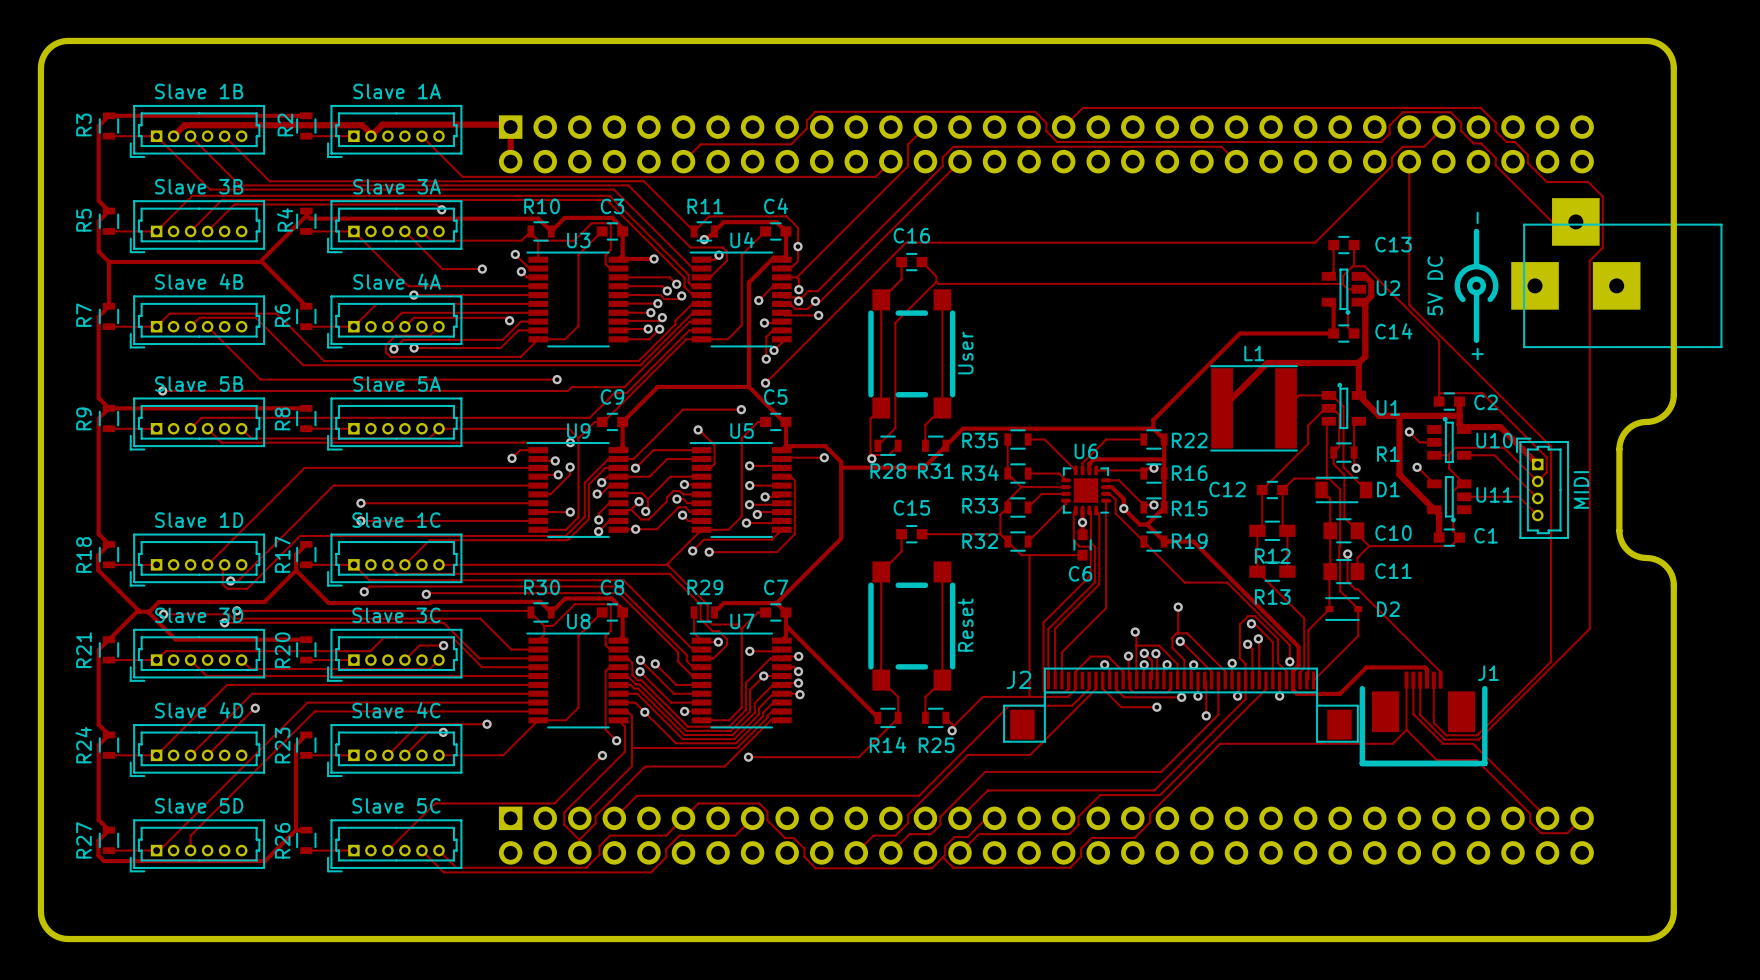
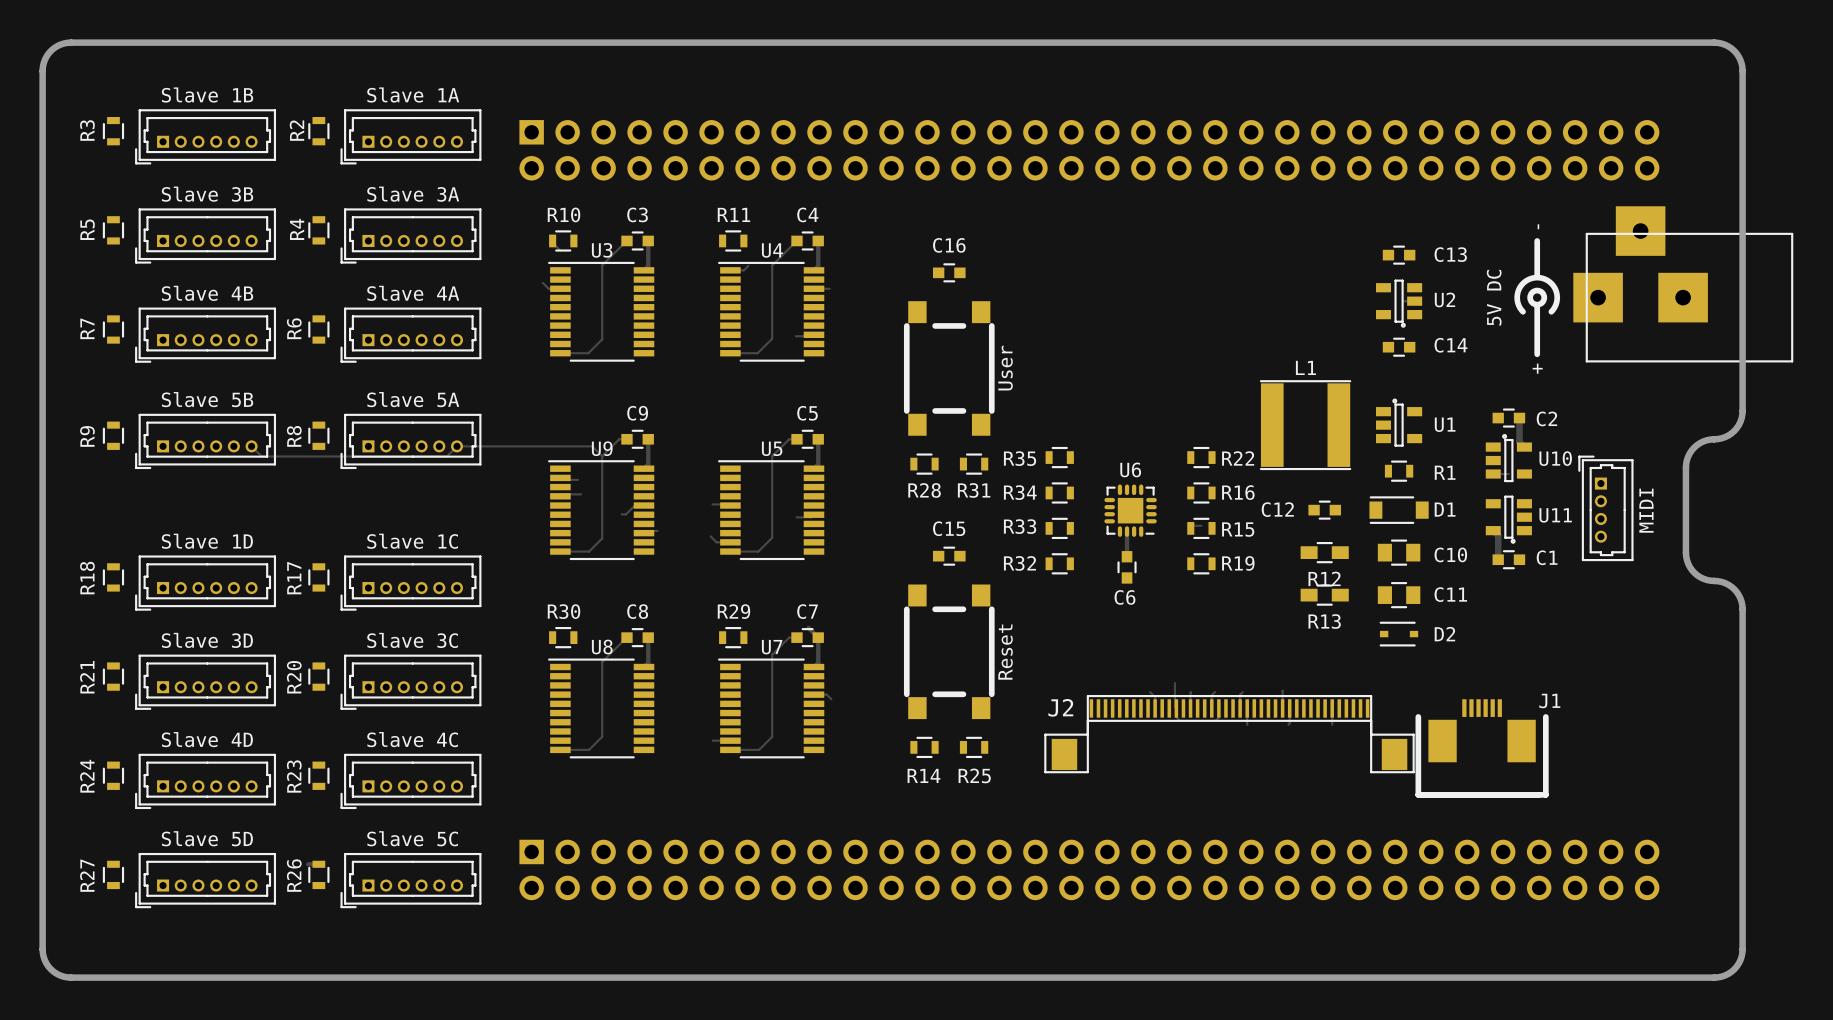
track: (306, 115) (108, 115) (98, 126) (98, 200) (108, 211) (98, 221) (98, 251) (108, 261) -> none
track: (925, 127) (908, 144) (908, 166) (796, 277) (798, 279) (798, 289) -> none
track: (1063, 127) (1082, 107) (1480, 107) (1495, 122) (1495, 131) (1506, 141) (1514, 141) (1527, 154) (1527, 163) (1546, 182) (1588, 182) (1602, 196) (1602, 247) (1589, 260) (1589, 628) (1479, 739) (1444, 739) (1420, 715) (1420, 680) -> none
track: (1443, 127) (1424, 146) (1402, 146) (1392, 157) (1392, 165) (1315, 242) (905, 242) (765, 383) -> none
track: (372, 135) (362, 125) (184, 125) (173, 136) -> none
track: (108, 136) (156, 136) (210, 189) (614, 189) (693, 268) (701, 268) -> none
track: (190, 136) (239, 185) (628, 185) (690, 247) (722, 247) (726, 251) (726, 260) (710, 277) (701, 277) -> none
track: (224, 136) (269, 181) (643, 181) (694, 231) (709, 216) (786, 216) (798, 227) (798, 261) (790, 268) (781, 268) -> none
track: (306, 136) (353, 136) -> none
track: (370, 136) (382, 124) (508, 124) (510, 127) (510, 161) -> none
track: (421, 136) (462, 176) (875, 176) (890, 161) -> none
track: (683, 161) (700, 144) (791, 144) (806, 128) (806, 120) (815, 111) (1035, 111) (1046, 122) (1046, 131) (1057, 141) (1381, 141) (1389, 133) (1389, 125) (1402, 112) (1450, 112) (1461, 122) (1461, 130) (1473, 143) (1481, 143) (1495, 157) (1495, 165) (1552, 221) (1575, 221) -> none
track: (959, 161) (820, 301) (815, 301) (807, 308) (795, 308) (790, 303) (781, 303) -> none
track: (1236, 161) (1221, 146) (953, 146) (942, 157) (942, 166) (817, 291) (808, 291) (802, 297) (784, 297) (781, 295) -> none
track: (1409, 161) (1409, 304) (1550, 446) (1550, 661) (1477, 735) (1446, 735) (1433, 722) (1433, 680) -> none
track: (441, 209) (436, 204) (234, 204) (207, 231) -> none
via: (441, 209) -> none
track: (306, 211) (306, 214) (309, 218) (538, 218) (551, 231) (564, 217) (612, 217) (622, 228) (622, 231) -> none
track: (306, 215) (261, 261) -> none
track: (108, 231) (156, 231) (192, 195) (609, 195) (688, 274) (688, 282) (692, 286) (701, 286) -> none
track: (190, 231) (222, 199) (606, 199) (684, 277) (684, 286) (692, 295) (701, 295) -> none
track: (306, 231) (353, 231) (408, 286) (538, 286) -> none
track: (404, 231) (442, 269) (482, 269) -> none
track: (421, 231) (431, 240) (521, 240) (530, 231) -> none
track: (785, 231) (776, 222) (723, 222) (704, 239) -> none
via: (704, 239) -> none
track: (1333, 245) (1333, 271) (1328, 276) -> none
track: (1354, 245) (1354, 266) -> none
via: (798, 246) -> none
track: (515, 254) (529, 268) (538, 268) -> none
via: (515, 254) -> none
via: (718, 255) -> none
track: (783, 257) (773, 257) (748, 282) (748, 386) -> none
track: (619, 258) (654, 258) -> none
via: (654, 258) -> none
track: (538, 259) (538, 240) (574, 240) (591, 223) (609, 223) (610, 224) (610, 249) (605, 255) (605, 264) (610, 268) (618, 268) -> none
track: (108, 261) (108, 306) (98, 316) (98, 398) (108, 408) -> none
track: (108, 261) (261, 261) -> none
track: (261, 261) (306, 306) -> none
track: (901, 262) (901, 279) (881, 299) (881, 408) (870, 418) (871, 455) -> none
track: (922, 262) (936, 276) (936, 281) -> none
via: (482, 269) -> none
via: (521, 271) -> none
track: (1358, 276) (1365, 276) (1371, 282) (1371, 296) (1365, 302) -> none
track: (618, 277) (669, 277) (676, 284) -> none
track: (936, 281) (938, 283) (1343, 283) -> none
track: (936, 281) (895, 322) (895, 428) (877, 445) -> none
via: (676, 284) -> none
track: (618, 286) (662, 286) (667, 291) -> none
track: (781, 286) (773, 286) (758, 300) -> none
via: (798, 289) -> none
via: (667, 291) -> none
track: (413, 295) (538, 295) -> none
via: (413, 295) -> none
track: (618, 295) (660, 295) (664, 299) (678, 299) (681, 295) -> none
via: (681, 295) -> none
track: (942, 299) (942, 408) (925, 425) (925, 445) -> none
via: (758, 300) -> none
via: (798, 301) -> none
via: (815, 301) -> none
track: (1328, 302) (1333, 306) (1333, 333) (1239, 333) (1153, 420) (1153, 428) -> none
track: (1365, 302) (1365, 356) (1358, 363) -> none
track: (538, 303) (376, 303) (353, 326) (306, 326) -> none
track: (657, 303) (618, 303) -> none
via: (657, 303) -> none
track: (701, 303) (692, 303) (675, 320) (675, 324) (638, 361) (324, 361) (276, 313) (169, 313) (156, 326) (108, 326) -> none
track: (538, 312) (401, 312) (387, 326) -> none
track: (618, 312) (650, 312) -> none
via: (650, 312) -> none
track: (701, 312) (692, 312) (640, 365) (303, 365) (255, 317) (199, 317) (190, 326) -> none
track: (781, 312) (784, 315) (818, 315) -> none
via: (818, 315) -> none
track: (662, 317) (659, 320) (618, 321) -> none
via: (662, 317) -> none
track: (509, 320) (506, 317) (413, 317) (404, 326) -> none
via: (509, 320) -> none
track: (538, 321) (520, 321) (502, 339) (403, 339) (393, 349) -> none
track: (701, 321) (689, 321) (624, 387) (571, 387) (567, 390) (162, 390) -> none
via: (764, 323) -> none
track: (207, 326) (260, 379) (557, 379) -> none
track: (438, 326) (429, 335) (395, 335) (385, 345) (385, 352) (390, 356) (520, 356) (538, 339) -> none
track: (648, 329) (618, 330) -> none
via: (648, 329) -> none
track: (659, 329) (649, 339) (618, 339) -> none
via: (659, 329) -> none
track: (538, 330) (518, 330) (500, 348) (414, 348) -> none
track: (701, 330) (689, 330) (626, 393) (614, 393) (589, 417) (201, 417) (190, 428) -> none
track: (781, 330) (772, 330) (766, 337) (766, 359) -> none
track: (1354, 333) (1347, 327) (1347, 289) (1343, 284) (1343, 275) (1352, 266) (1364, 266) (1439, 340) (1439, 401) -> none
track: (701, 339) (686, 339) (602, 421) -> none
track: (781, 339) (781, 342) (774, 350) -> none
via: (414, 348) -> none
via: (393, 349) -> none
via: (774, 350) -> none
via: (766, 359) -> none
track: (1358, 363) (1358, 395) (1379, 415) (1459, 415) -> none
track: (1358, 363) (1267, 363) (1222, 408) -> none
via: (557, 379) -> none
via: (765, 383) -> none
track: (748, 386) (785, 421) -> none
track: (748, 386) (657, 386) (622, 421) -> none
via: (162, 390) -> none
track: (1439, 393) (1482, 393) (1546, 457) (1546, 472) (1537, 481) (1504, 447) (1455, 447) (1449, 454) (1449, 468) (1462, 482) -> none
track: (108, 408) (306, 408) -> none
track: (108, 408) (98, 418) (98, 534) (108, 544) (98, 555) (98, 570) (138, 610) -> none
track: (1286, 408) (1298, 395) (1332, 395) (1343, 406) (1343, 467) (1366, 489) -> none
track: (741, 409) (682, 409) (633, 459) (608, 459) (584, 482) (584, 516) (565, 535) (300, 535) (247, 588) (227, 588) (222, 584) (222, 566) (224, 564) -> none
via: (741, 409) -> none
track: (1399, 415) (1399, 474) (1434, 509) -> none
track: (1328, 421) (1326, 423) (1326, 478) -> none
track: (1358, 421) (1354, 426) (1354, 466) (1356, 468) -> none
track: (1461, 427) (1500, 427) (1537, 464) -> none
track: (108, 428) (156, 428) -> none
track: (207, 428) (221, 442) (570, 442) -> none
track: (306, 428) (353, 428) -> none
track: (1153, 428) (962, 428) (923, 467) (841, 467) -> none
track: (1153, 428) (1164, 439) (1164, 507) (1147, 524) -> none
track: (698, 429) (714, 445) (714, 463) (710, 467) (701, 467) -> none
via: (698, 429) -> none
track: (1409, 431) (1419, 442) (1434, 442) -> none
via: (1409, 431) -> none
track: (1007, 439) (1007, 473) (1021, 487) -> none
track: (1028, 439) (1044, 439) (1075, 470) -> none
track: (1143, 439) (1106, 439) (1082, 463) (1082, 470) -> none
via: (570, 442) -> none
track: (898, 445) (888, 455) (871, 455) -> none
track: (785, 446) (825, 446) (841, 461) (841, 538) (776, 603) (723, 603) (714, 612) -> none
track: (538, 450) (520, 450) (512, 458) -> none
track: (701, 450) (653, 450) (635, 468) -> none
track: (1464, 455) (1494, 455) (1537, 498) -> none
track: (824, 457) (781, 459) -> none
via: (824, 457) -> none
via: (512, 458) -> none
via: (871, 458) -> none
track: (701, 459) (667, 459) (649, 476) (607, 476) (601, 482) -> none
track: (1164, 459) (1093, 459) (1089, 463) (1089, 470) -> none
via: (555, 460) -> none
track: (749, 465) (779, 465) (781, 467) -> none
via: (749, 465) -> none
track: (538, 467) (304, 467) (207, 564) -> none
track: (570, 467) (570, 474) (550, 494) (538, 494) -> none
via: (570, 467) -> none
track: (618, 467) (605, 467) (588, 484) (588, 519) (567, 540) (429, 540) (404, 564) -> none
track: (1417, 467) (1434, 483) -> none
via: (1417, 467) -> none
via: (635, 468) -> none
track: (1153, 468) (1149, 468) (1143, 473) (1140, 470) (1096, 470) -> none
via: (1153, 468) -> none
via: (1356, 468) -> none
track: (1028, 473) (1059, 473) (1065, 480) -> none
via: (558, 474) -> none
track: (701, 476) (670, 476) (647, 499) -> none
track: (781, 476) (790, 476) (794, 480) (794, 534) (776, 552) (709, 552) -> none
track: (1106, 480) (1119, 480) (1143, 505) (1143, 507) -> none
via: (601, 482) -> none
track: (1462, 482) (1453, 491) (1453, 531) (1459, 537) (1451, 546) (1369, 546) -> none
via: (684, 484) -> none
track: (538, 485) (333, 485) (238, 580) (230, 580) -> none
track: (749, 485) (781, 485) -> none
via: (749, 485) -> none
track: (1021, 487) (1065, 487) -> none
track: (1021, 487) (1007, 500) (1007, 507) (1000, 514) (1000, 534) -> none
track: (1106, 487) (1111, 487) (1123, 499) (1123, 508) (1139, 524) (1147, 524) -> none
track: (1321, 489) (1330, 498) (1329, 609) (1308, 630) (1308, 678) (1306, 680) -> none
track: (1065, 493) (1041, 493) (1028, 507) -> none
track: (1106, 493) (1109, 493) (1115, 499) (1115, 513) (1184, 582) (1227, 582) (1289, 645) (1289, 661) -> none
via: (597, 494) -> none
track: (618, 494) (641, 493) (647, 499) -> none
track: (701, 494) (683, 494) (679, 491) (673, 491) (666, 497) (666, 501) (648, 519) (641, 519) (631, 510) (639, 501) -> none
via: (765, 496) -> none
track: (1464, 496) (1519, 496) (1537, 515) -> none
track: (647, 499) (647, 509) (645, 511) -> none
track: (676, 499) (683, 499) (687, 503) (701, 503) -> none
via: (676, 499) -> none
track: (1065, 500) (1065, 503) (1028, 541) -> none
track: (1106, 500) (1106, 608) (1061, 652) (1061, 680) -> none
via: (639, 501) -> none
track: (360, 503) (538, 503) -> none
via: (360, 503) -> none
track: (618, 503) (609, 503) (598, 513) (598, 520) -> none
track: (781, 503) (749, 504) -> none
via: (749, 504) -> none
via: (1153, 505) -> none
via: (1123, 508) -> none
track: (1075, 510) (1073, 512) (1073, 540) (1079, 546) (1088, 546) (1090, 548) (1090, 575) (1043, 622) (1043, 690) (1045, 692) (1065, 692) (1068, 688) (1068, 680) -> none
track: (1089, 510) (1090, 512) (1090, 542) (1094, 546) (1094, 582) (1048, 629) (1048, 680) -> none
track: (1096, 510) (1099, 513) (1099, 584) (1055, 628) (1055, 680) -> none
via: (645, 511) -> none
track: (538, 512) (570, 512) -> none
via: (570, 512) -> none
track: (701, 512) (690, 512) (685, 507) (678, 507) (656, 529) (618, 529) -> none
track: (781, 512) (759, 512) (757, 514) -> none
via: (757, 514) -> none
via: (682, 515) -> none
track: (360, 520) (538, 520) -> none
via: (360, 520) -> none
via: (598, 520) -> none
track: (618, 520) (609, 520) (598, 531) -> none
track: (781, 520) (779, 523) (746, 523) -> none
via: (1082, 522) -> none
via: (746, 523) -> none
track: (1147, 524) (1164, 541) (1193, 541) (1298, 646) (1298, 665) (1293, 670) (1293, 690) (1296, 693) (1339, 693) (1366, 667) (1424, 667) (1426, 669) (1426, 680) -> none
via: (635, 529) -> none
track: (701, 529) (666, 564) (438, 564) -> none
track: (781, 529) (771, 539) (703, 539) (692, 550) -> none
via: (598, 531) -> none
track: (901, 534) (901, 551) (881, 571) (881, 680) (898, 697) (898, 717) (858, 757) (748, 757) -> none
track: (922, 534) (1000, 534) -> none
track: (1000, 534) (1021, 555) (1082, 555) -> none
track: (306, 544) (295, 554) (295, 570) -> none
track: (1369, 546) (1344, 517) (1344, 474) (1333, 464) (1333, 452) (1339, 447) (1339, 414) (1332, 408) (1325, 408) (1308, 425) (1308, 444) (1262, 489) (1262, 526) (1257, 530) (1257, 571) (1304, 618) (1304, 668) (1300, 672) (1300, 680) -> none
track: (1369, 546) (1357, 557) (1357, 571) -> none
via: (692, 550) -> none
via: (709, 552) -> none
via: (1347, 553) -> none
track: (1347, 554) (1347, 581) (1355, 589) (1357, 589) (1440, 671) (1440, 680) -> none
track: (1029, 555) (1029, 696) -> none
track: (108, 564) (156, 564) -> none
track: (306, 564) (353, 564) (369, 580) (623, 580) (692, 649) (701, 649) -> none
track: (387, 564) (396, 573) (669, 573) (700, 604) (700, 619) (712, 631) (719, 631) (727, 639) (727, 645) (713, 658) (701, 658) -> none
track: (667, 564) (707, 605) (707, 620) (712, 624) (737, 624) (741, 628) (758, 612) -> (772, 654) (789, 637)
track: (295, 570) (328, 603) (540, 601) (551, 612) (565, 598) (611, 598) (622, 609) (622, 612) -> none
track: (295, 570) (264, 602) (158, 602) (149, 611) -> none
track: (942, 571) (942, 680) (925, 697) (925, 717) -> none
track: (1287, 571) (1287, 530) (1282, 526) (1282, 489) (1294, 478) (1329, 478) (1340, 489) (1340, 591) (1358, 609) (1358, 635) (1313, 680) -> none
via: (230, 580) -> none
track: (364, 591) (369, 586) (618, 586) (686, 655) (686, 661) (692, 667) (701, 667) -> none
via: (364, 591) -> none
track: (426, 594) (618, 593) (678, 652) (678, 661) (692, 676) (701, 676) -> none
via: (426, 594) -> none
track: (1178, 607) (1178, 633) -> none
via: (1178, 607) -> none
track: (138, 610) (98, 649) (98, 724) (108, 734) (98, 745) (98, 819) (108, 830) (98, 840) (98, 855) (103, 861) (265, 861) (295, 830) (295, 745) (306, 734) -> none
track: (138, 610) (149, 611) -> none
track: (236, 610) (529, 610) (544, 625) -> none
via: (236, 610) -> none
track: (149, 611) (175, 639) (306, 639) -> none
track: (694, 612) (694, 633) (702, 642) (718, 642) -> none
track: (163, 614) (228, 614) (233, 618) (480, 618) (511, 649) (538, 649) -> none
via: (163, 614) -> none
track: (224, 622) (443, 622) (479, 658) (538, 658) -> none
via: (224, 622) -> none
track: (1251, 623) (1254, 623) (1272, 642) (1272, 680) -> none
via: (1251, 623) -> none
track: (544, 625) (544, 634) (538, 640) -> none
track: (544, 625) (553, 625) (574, 604) (609, 604) (610, 606) (610, 630) (605, 636) (605, 645) (610, 649) (618, 649) -> none
track: (785, 627) (877, 717) -> none
track: (1135, 632) (1136, 680) -> none
via: (1135, 632) -> none
track: (1258, 638) (1259, 680) -> none
via: (1258, 638) -> none
track: (1180, 641) (1211, 671) (1211, 680) -> none
via: (1180, 641) -> none
via: (718, 642) -> none
track: (1247, 644) (1252, 649) (1252, 680) -> none
via: (1247, 644) -> none
track: (443, 645) (419, 645) (404, 660) -> none
via: (443, 645) -> none
track: (1136, 645) (1159, 645) (1177, 664) (1177, 680) -> none
track: (781, 649) (780, 651) (749, 651) -> none
via: (749, 651) -> none
track: (1144, 653) (1152, 661) (1152, 678) (1150, 680) -> none
via: (1144, 653) -> none
track: (1155, 653) (1157, 680) -> none
via: (1155, 653) -> none
track: (798, 656) (770, 658) (745, 682) (745, 709) (729, 726) (687, 726) (641, 680) (637, 680) (632, 674) (632, 662) (627, 658) (618, 658) -> none
via: (798, 656) -> none
via: (1128, 656) -> none
track: (108, 660) (156, 660) (165, 651) (370, 651) (383, 637) (452, 637) (482, 667) (538, 667) -> none
track: (190, 660) (206, 676) (538, 676) -> none
track: (241, 660) (250, 668) (430, 668) (438, 660) -> none
track: (306, 660) (353, 660) -> none
track: (640, 660) (674, 693) (701, 693) -> none
via: (640, 660) -> none
via: (1289, 661) -> none
track: (655, 663) (676, 684) (701, 684) -> none
via: (655, 663) -> none
via: (1232, 663) -> none
via: (1104, 664) -> none
via: (1144, 664) -> none
via: (1167, 664) -> none
via: (1193, 664) -> none
track: (618, 667) (609, 667) (605, 671) (605, 729) (616, 740) -> none
track: (640, 671) (671, 702) (701, 702) -> none
via: (640, 671) -> none
via: (798, 671) -> none
track: (618, 676) (627, 676) (636, 684) (639, 684) (686, 730) (730, 730) (750, 711) (750, 689) (763, 676) (781, 676) -> none
via: (763, 676) -> none
track: (1089, 680) (1089, 688) (1072, 705) (1009, 705) (919, 795) (636, 795) (614, 818) -> none
track: (1095, 680) (1095, 689) (1030, 754) (967, 754) (908, 814) (908, 822) (895, 835) (873, 835) (856, 852) -> none
track: (1102, 680) (1102, 688) (1121, 707) (1156, 707) -> none
track: (1116, 680) (1116, 689) (1124, 697) (1181, 697) -> none
track: (1123, 680) (1123, 671) (1108, 656) (1090, 656) (1075, 671) (1075, 689) (1068, 696) (982, 696) (952, 727) (952, 730) -> none
track: (1184, 680) (1184, 659) (1172, 647) (1172, 637) (1176, 633) (1187, 633) (1225, 671) (1225, 680) -> none
track: (1204, 680) (1206, 715) -> none
track: (1218, 680) (1218, 714) (1161, 771) (985, 771) (940, 816) (940, 824) (930, 834) (909, 834) (890, 852) -> none
track: (1266, 680) (1266, 689) (1160, 795) (1100, 795) (1078, 816) (1078, 824) (1069, 834) (978, 834) (959, 852) -> none
track: (1286, 680) (1286, 671) (1278, 663) (1278, 639) (1254, 616) (1248, 616) (1239, 624) (1239, 658) (1245, 664) (1245, 699) (1154, 790) (987, 790) (959, 818) -> none
track: (1406, 680) (1406, 729) -> none
track: (1413, 680) (1413, 714) (1443, 743) (1473, 743) (1547, 818) -> none
track: (798, 683) (772, 684) (754, 703) (754, 712) (732, 735) (684, 735) (638, 688) (634, 688) (630, 684) (618, 684) -> none
via: (798, 683) -> none
track: (538, 684) (227, 684) (156, 755) (108, 755) -> none
track: (538, 693) (252, 693) (190, 755) -> none
track: (618, 693) (637, 693) (682, 739) (734, 739) (758, 714) (758, 708) (773, 693) (799, 694) -> none
via: (799, 694) -> none
via: (1197, 696) -> none
via: (1237, 696) -> none
via: (1279, 696) -> none
via: (1181, 697) -> none
track: (538, 702) (307, 702) (159, 850) (108, 850) -> none
track: (618, 702) (635, 702) (675, 743) (735, 743) (763, 716) (763, 712) (773, 702) (781, 702) -> none
via: (1156, 707) -> none
track: (255, 708) (207, 755) -> none
via: (255, 708) -> none
track: (538, 711) (314, 711) (190, 835) (190, 850) -> none
track: (618, 711) (627, 711) (632, 716) (632, 766) (579, 818) -> none
via: (684, 711) -> none
track: (781, 711) (771, 711) (737, 747) (632, 747) -> none
via: (644, 712) -> none
via: (1206, 715) -> none
track: (945, 717) (953, 725) -> none
track: (538, 720) (503, 755) (438, 755) -> none
track: (618, 720) (624, 726) (624, 751) (564, 812) (564, 824) (579, 840) (579, 852) -> none
track: (781, 720) (770, 720) (724, 766) (645, 766) (595, 816) (595, 823) (579, 839) -> none
track: (487, 724) (419, 724) (387, 755) -> none
via: (487, 724) -> none
track: (1406, 729) (1392, 743) (1220, 743) (1150, 813) (1150, 822) (1134, 838) (1091, 838) (1080, 848) (1080, 856) (1070, 867) (953, 867) (942, 857) -> none
track: (1406, 729) (1436, 760) (1476, 760) (1530, 813) (1530, 822) (1541, 833) (1567, 833) (1582, 818) -> none
via: (952, 730) -> none
track: (443, 732) (427, 732) (404, 755) -> none
via: (443, 732) -> none
via: (616, 740) -> none
track: (306, 755) (353, 755) -> none
track: (602, 755) (554, 803) (435, 803) (387, 850) -> none
via: (602, 755) -> none
via: (748, 757) -> none
track: (752, 818) (735, 835) (679, 835) (666, 848) (666, 857) (651, 872) (443, 872) (421, 850) -> none
track: (994, 818) (986, 818) (967, 837) (954, 837) (945, 846) (945, 855) (931, 868) (815, 868) (804, 857) (804, 848) (793, 838) (785, 838) (767, 820) (767, 811) (759, 803) (698, 803) (666, 835) (610, 835) (599, 846) (599, 854) (586, 867) (456, 867) (438, 850) -> none
track: (306, 850) (353, 850) -> none

